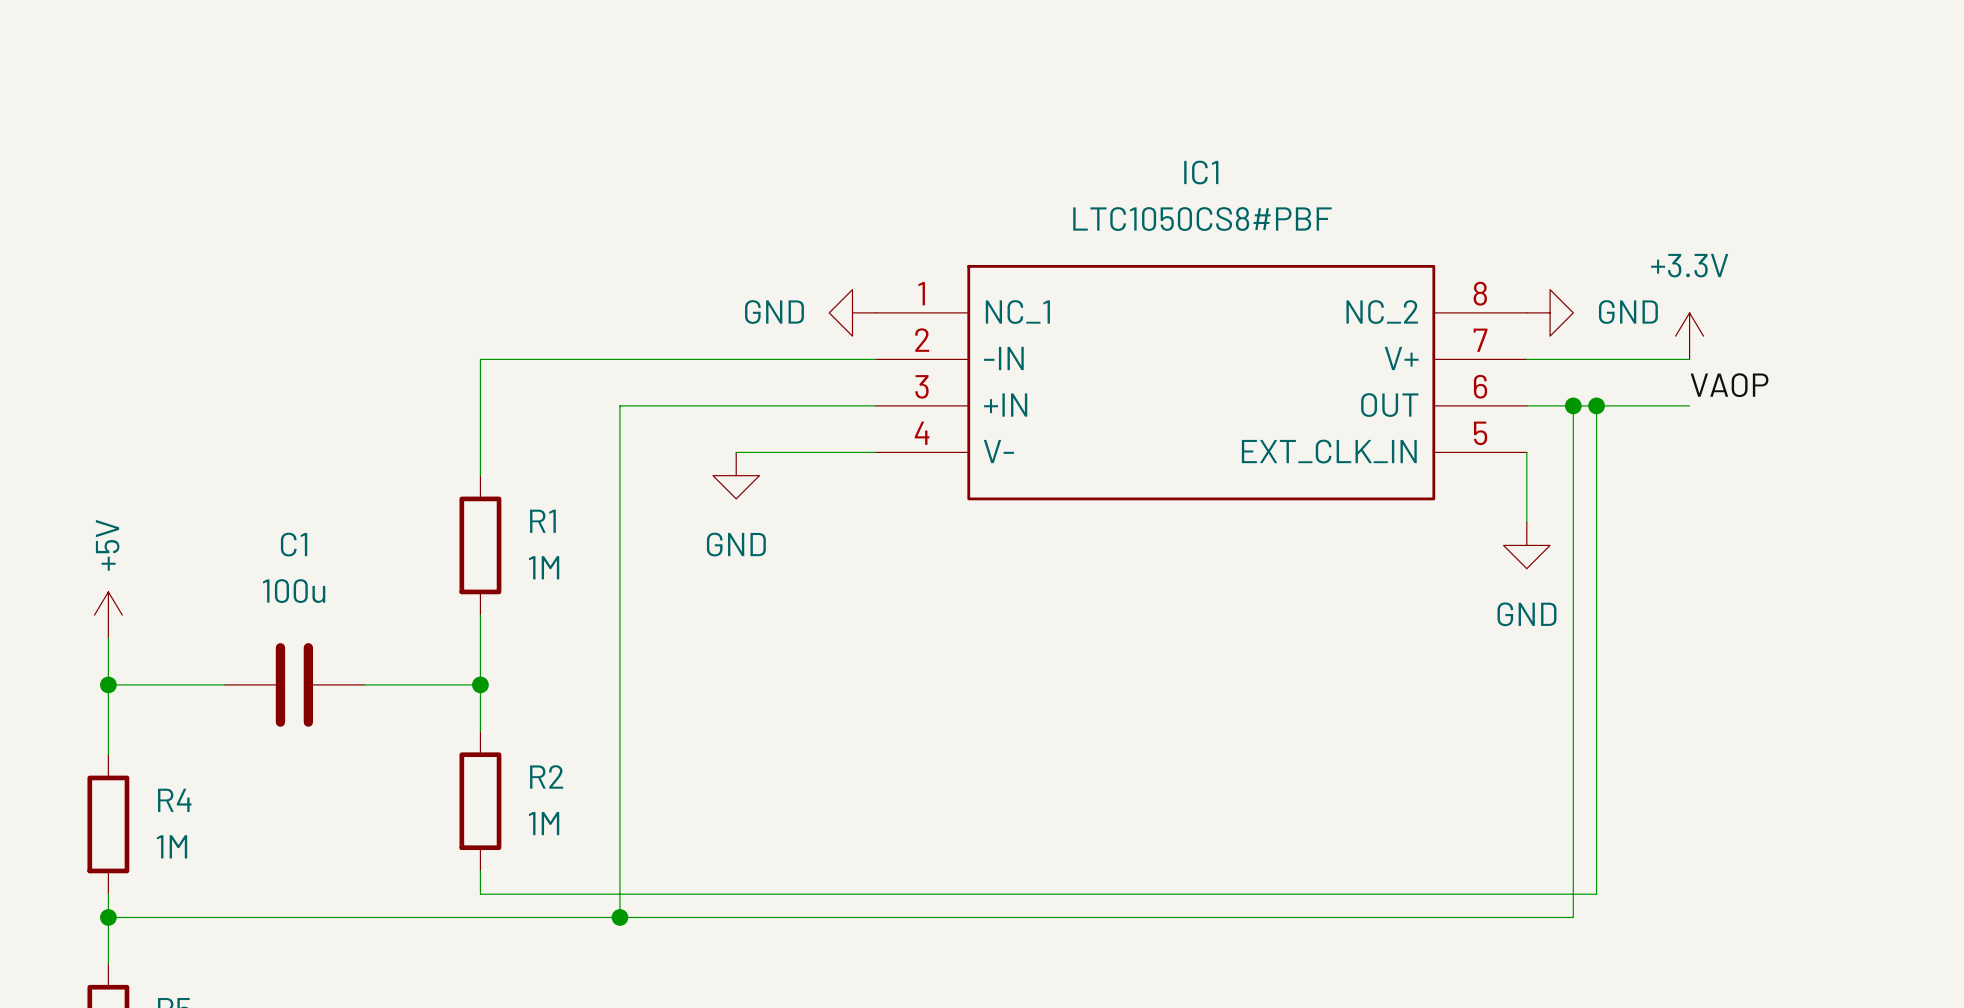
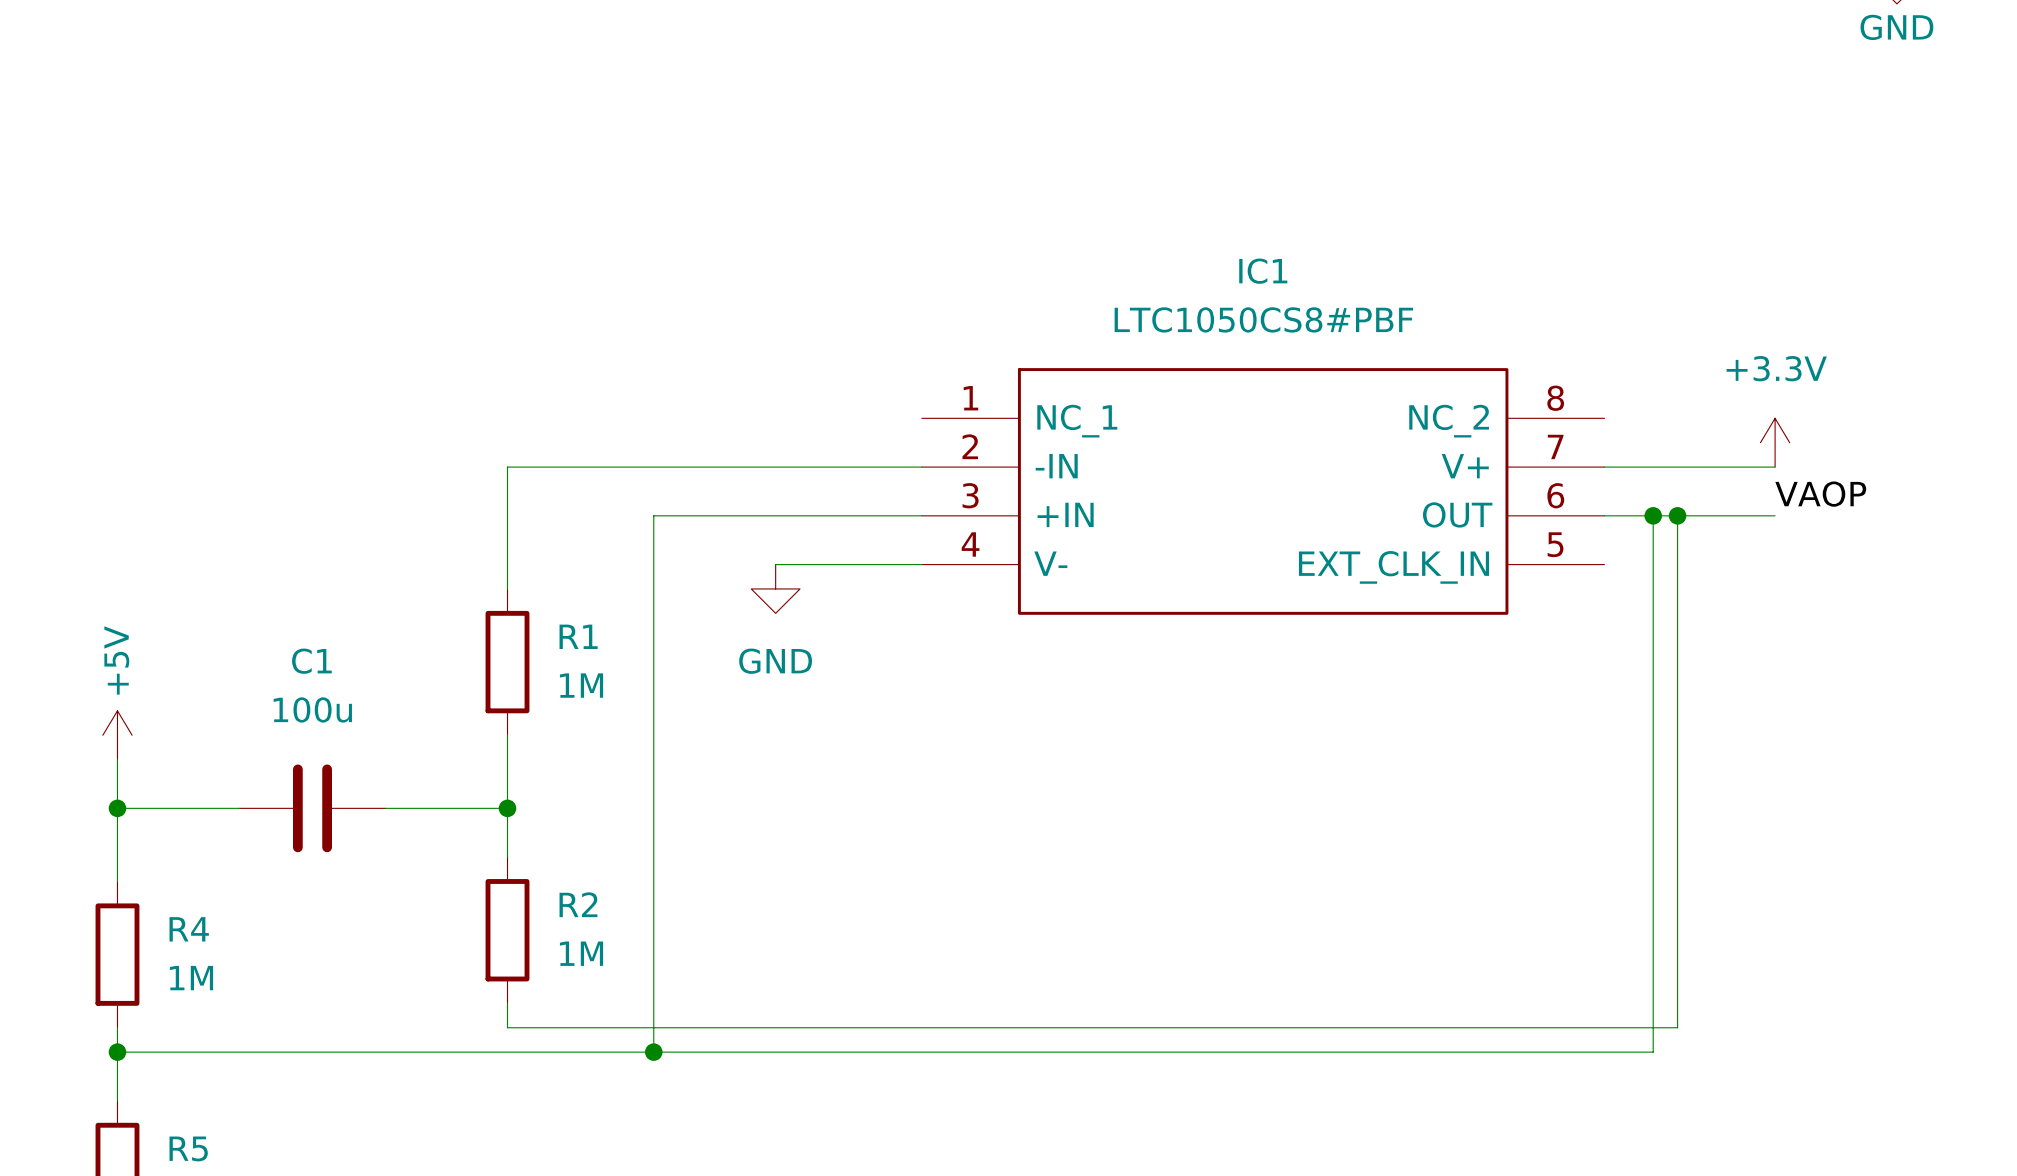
power symbol: GND (852, 312) -> none
power symbol: GND (1550, 312) -> none
wire: (1526, 452) (1526, 522) -> none
power symbol: GND (1526, 545) -> none

